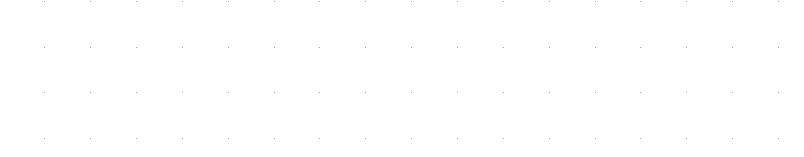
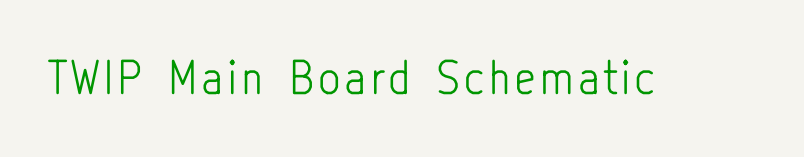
text: none -> TWIP Main Board Schematic (350, 76)

